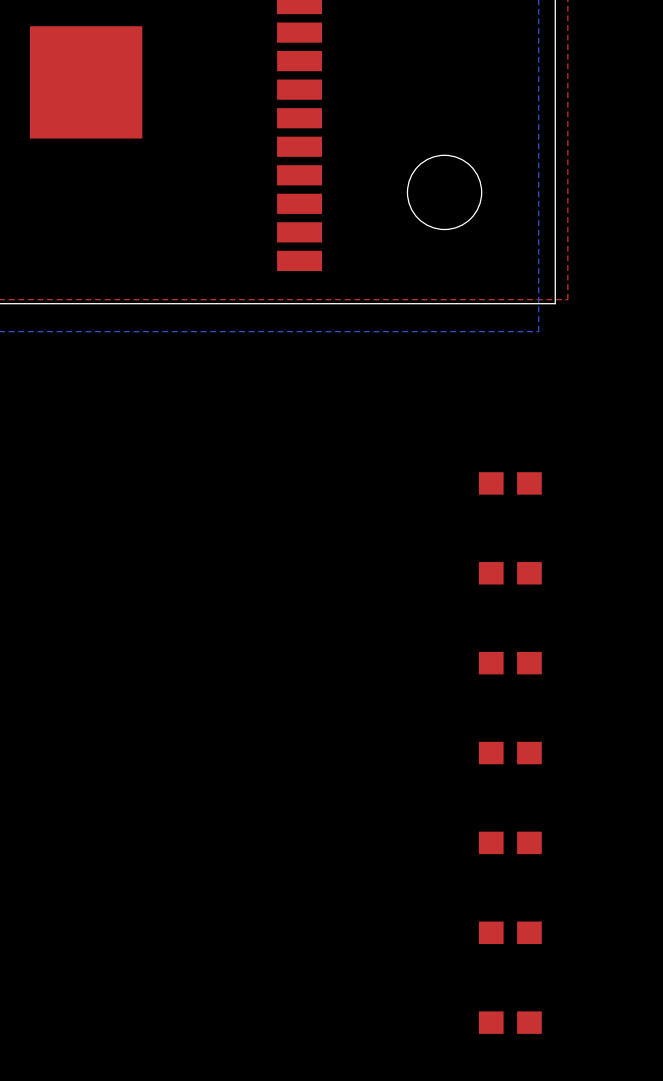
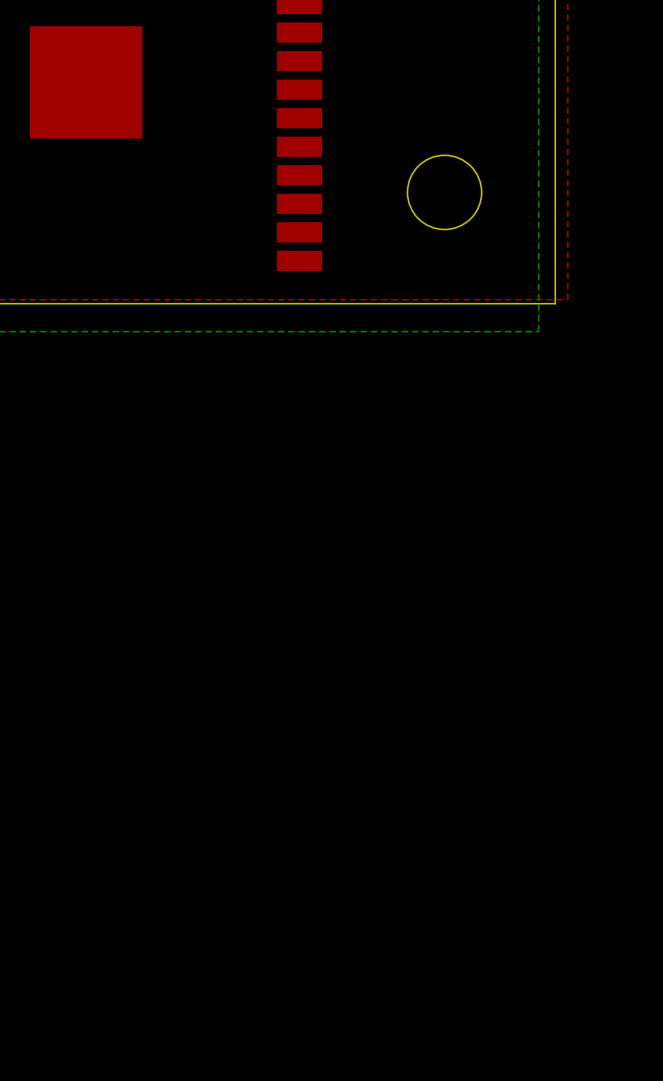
part: (510, 483) -> none
part: (510, 573) -> none
part: (510, 663) -> none
part: (510, 753) -> none
part: (510, 842) -> none
part: (510, 932) -> none
part: (510, 1022) -> none

